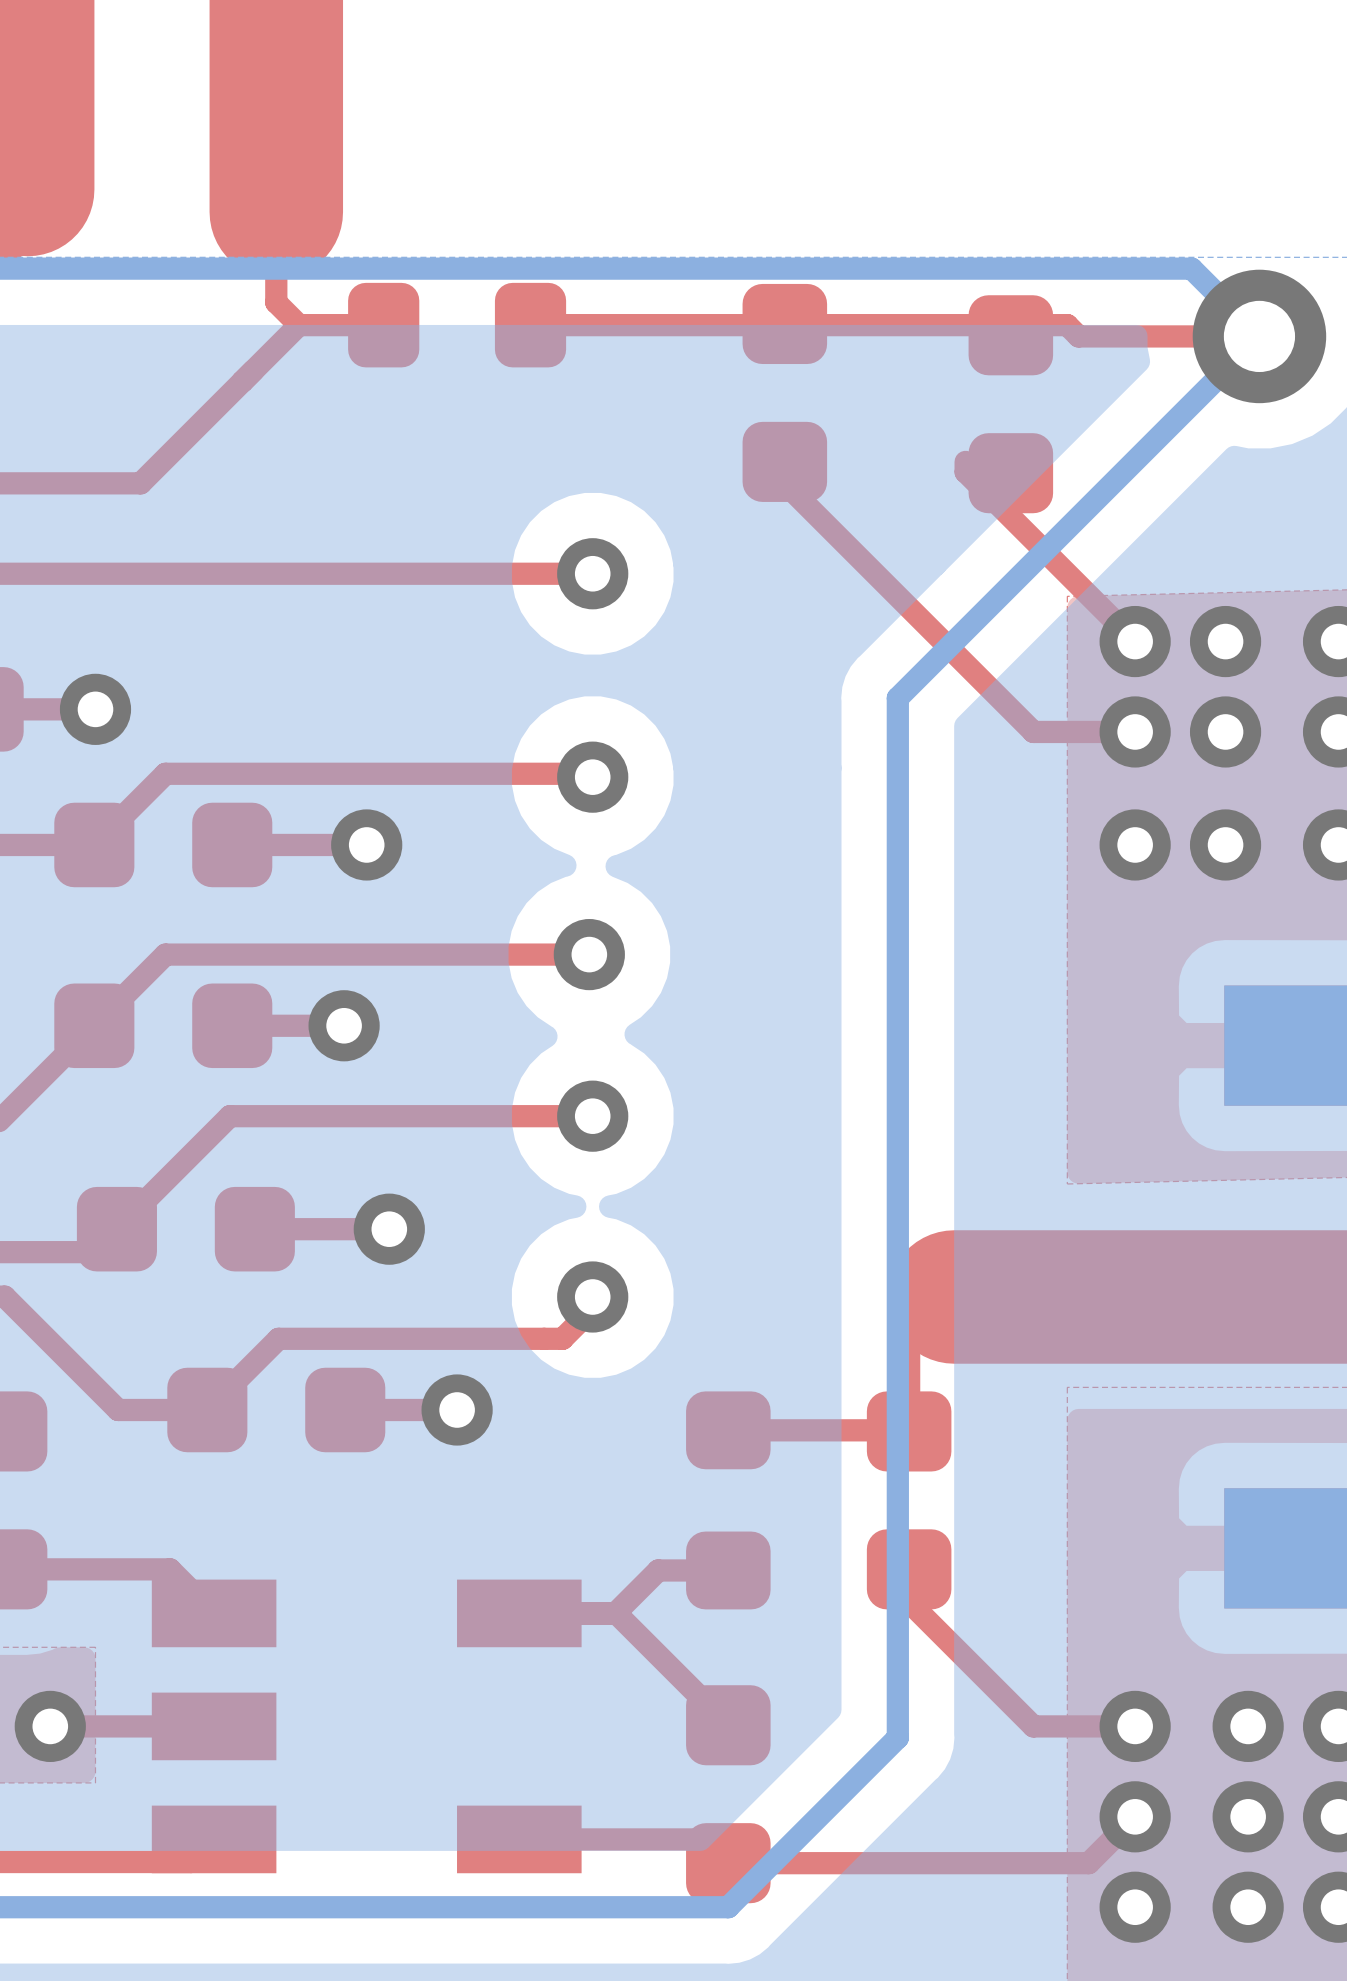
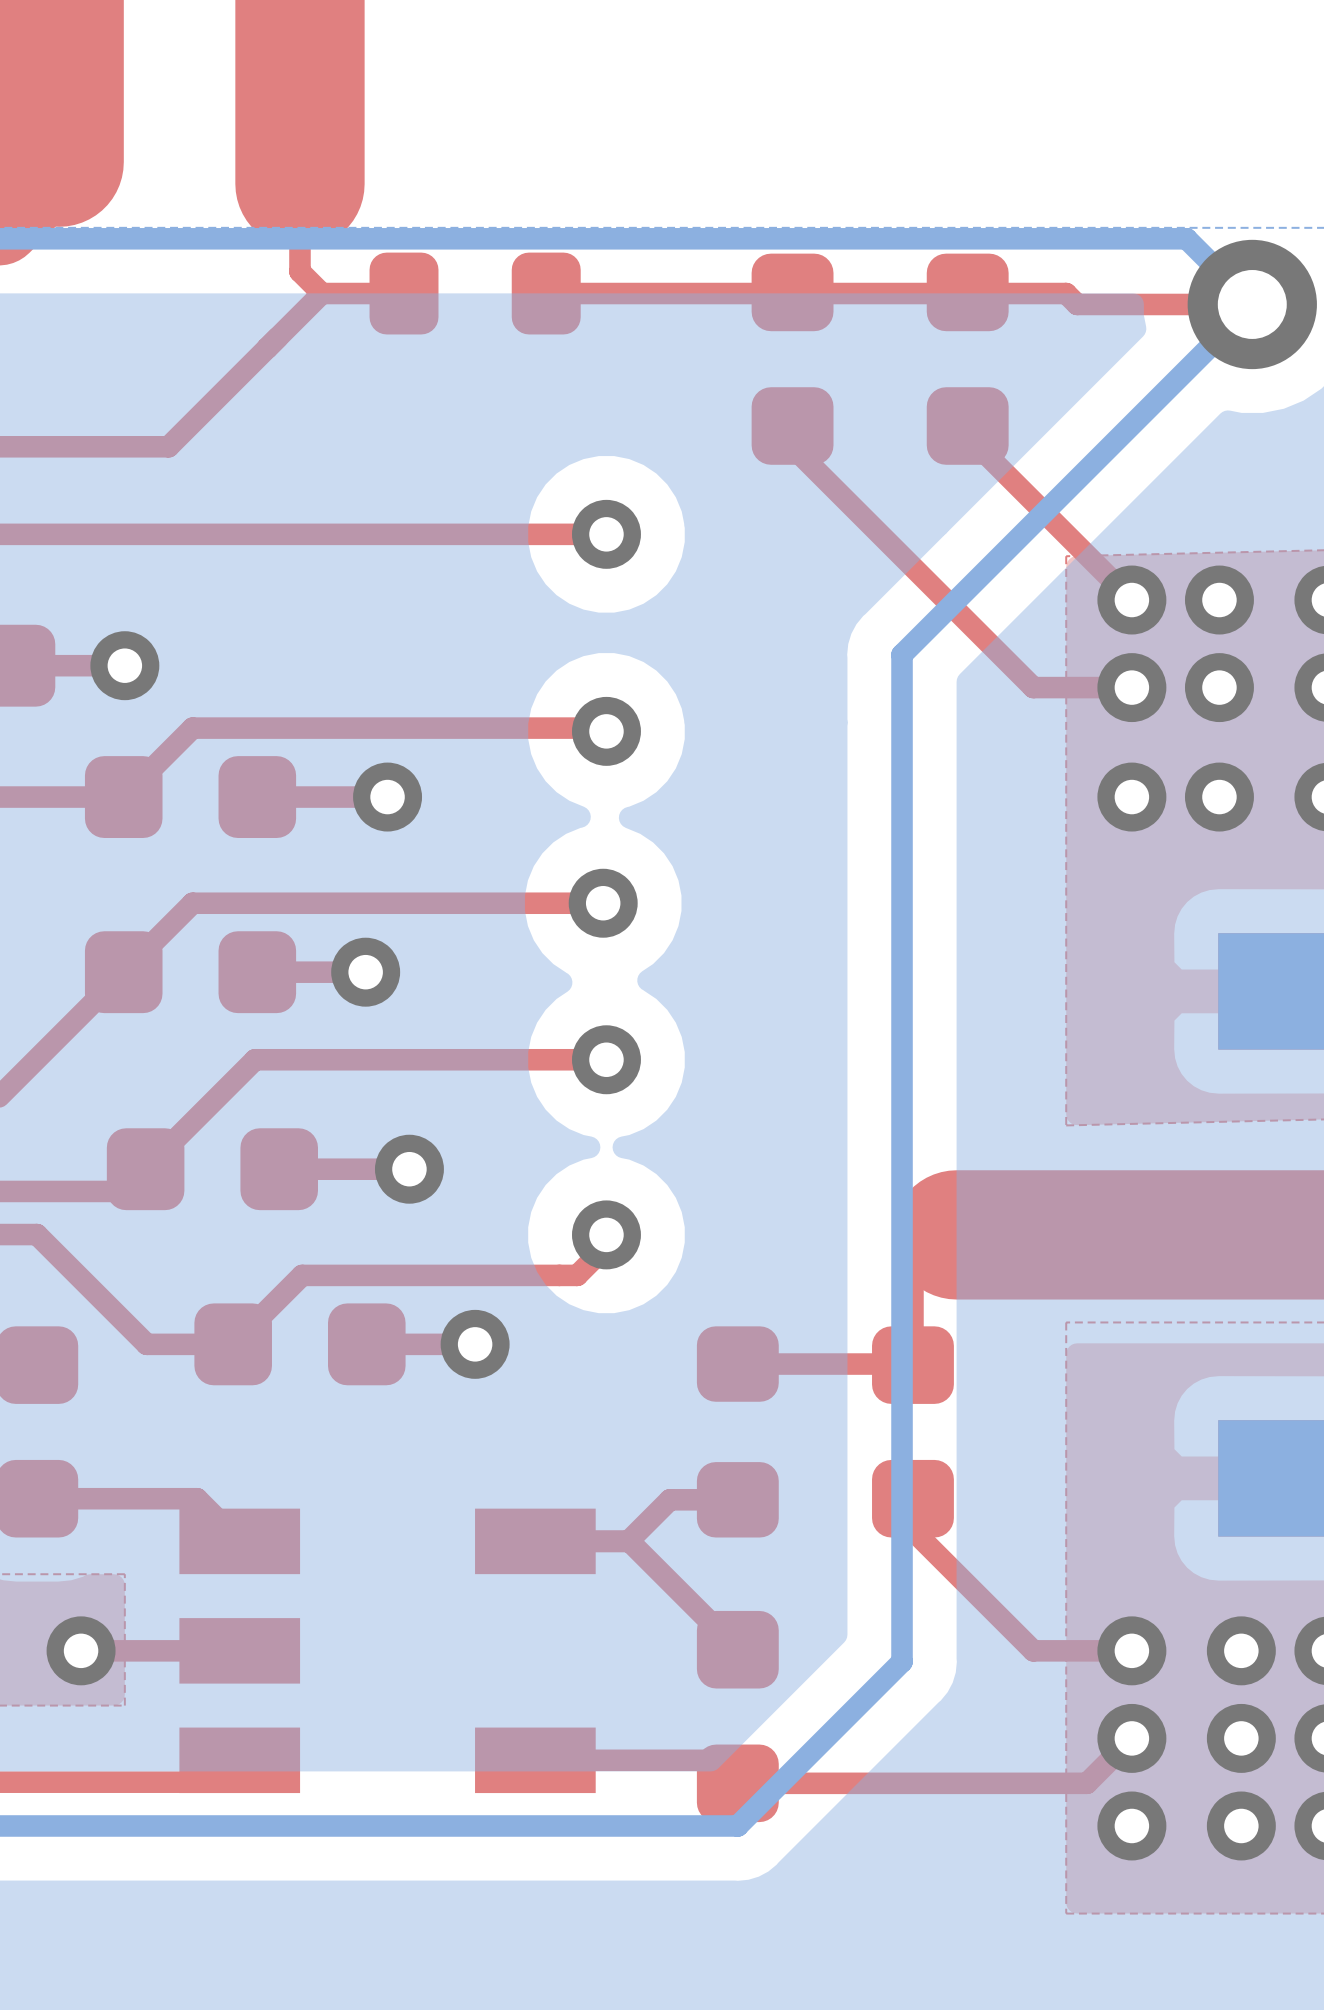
part position: (1010, 404) -> (967, 359)

